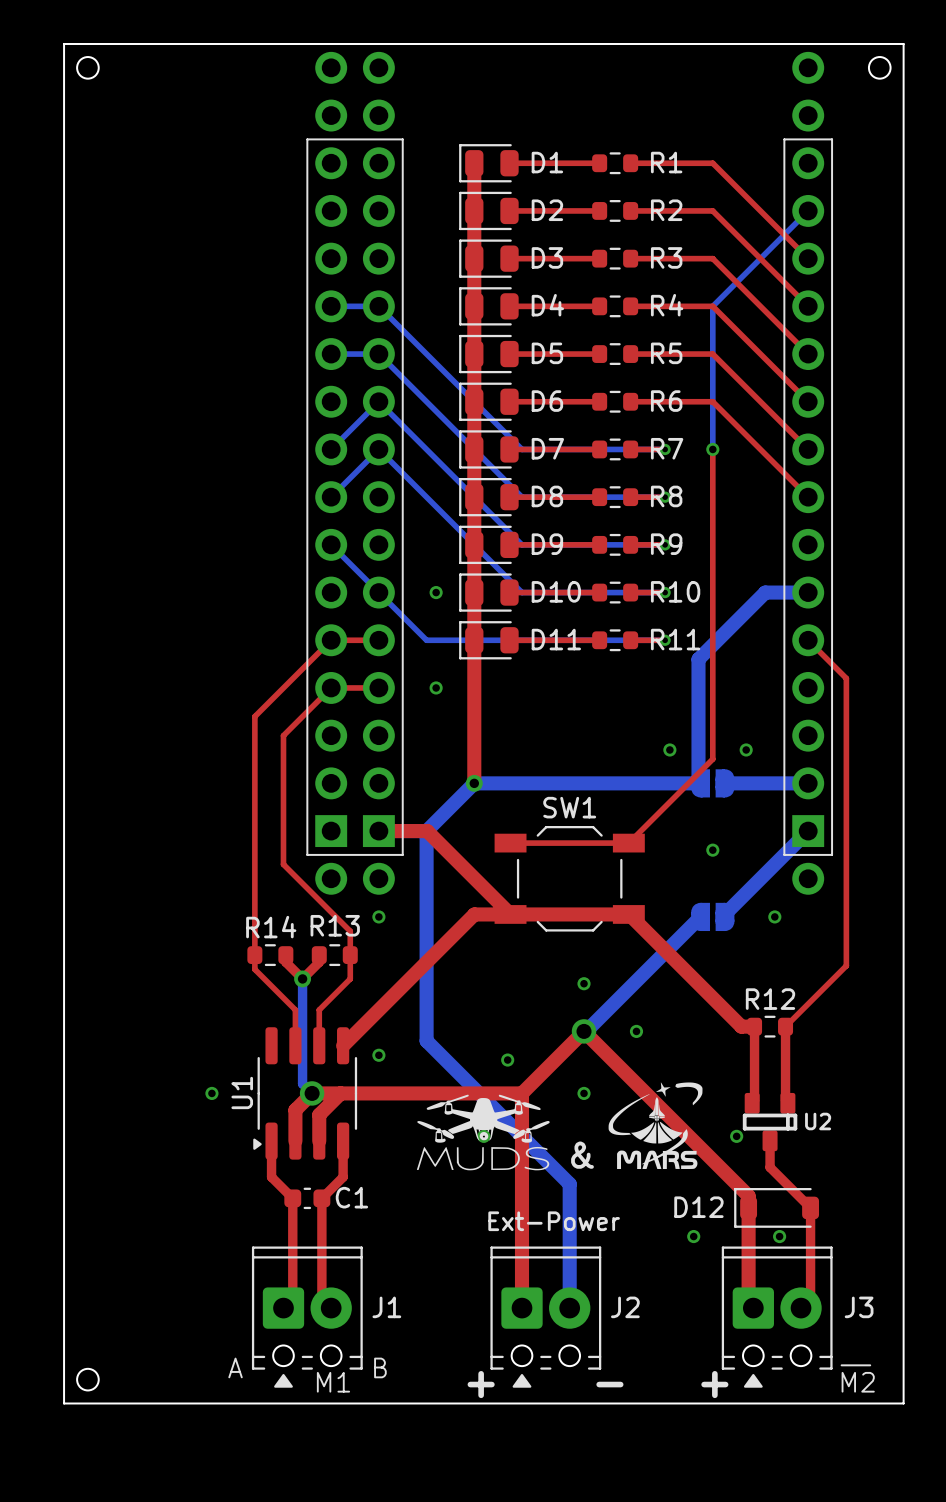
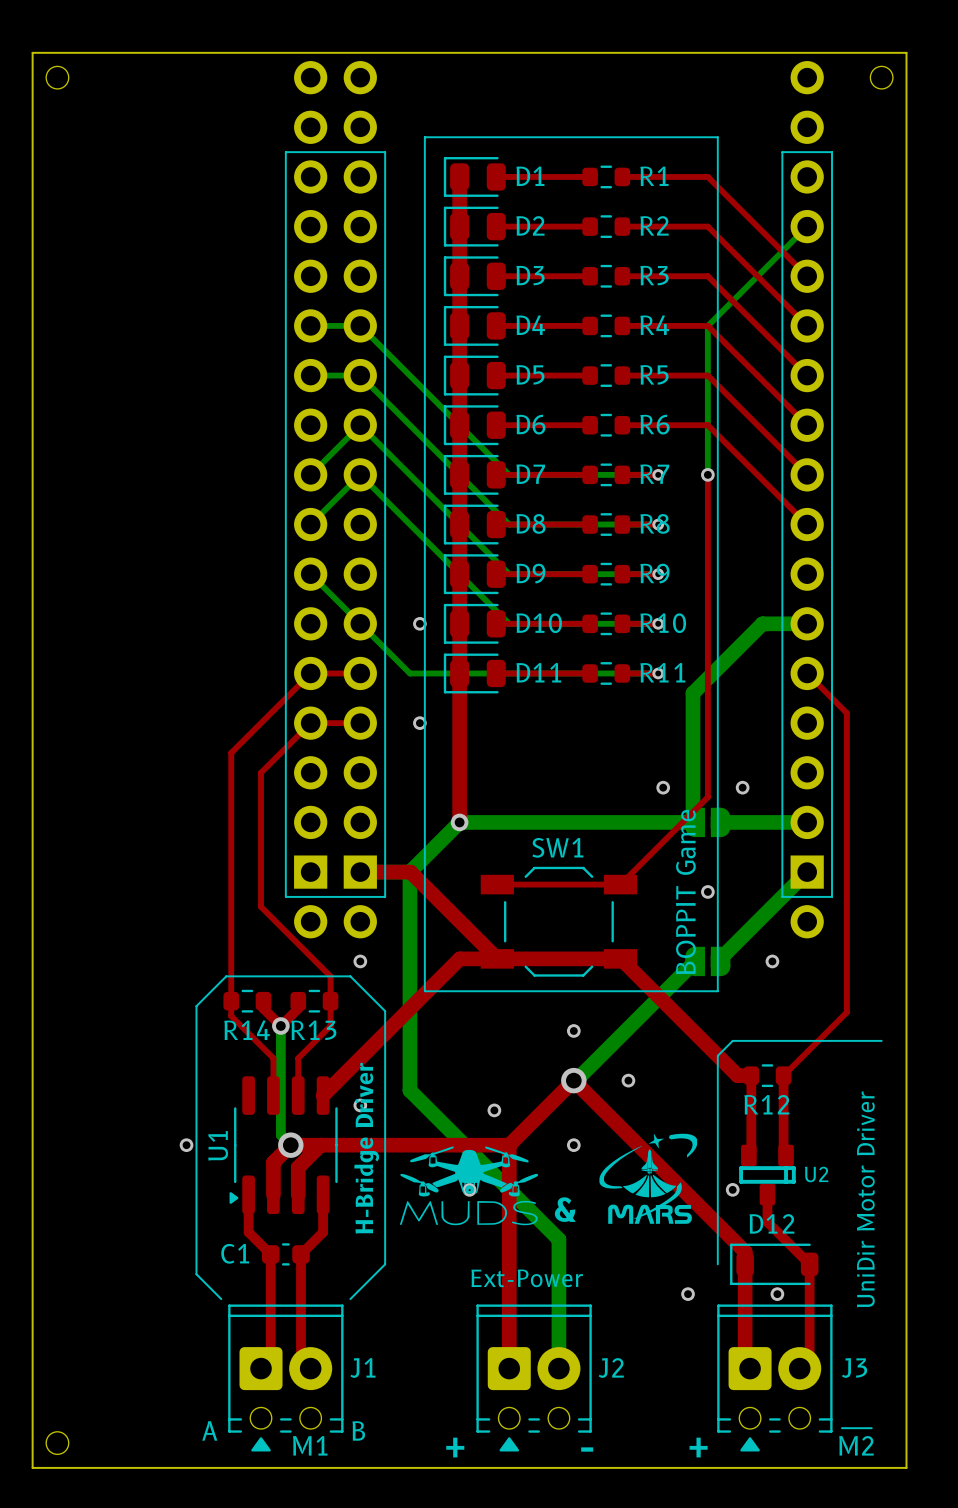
line: none -> (424, 137) (717, 137) (717, 991) (424, 991) (424, 137)
text: none -> BOPPIT Game (685, 892)
R13 name position: R13 (335, 925) -> R13 (313, 1030)
R14 name position: R14 (271, 927) -> R14 (247, 1030)
line: none -> (881, 1040) (732, 1040) (717, 1055) (717, 1264)
R12 name position: R12 (770, 999) -> R12 (766, 1104)
text: none -> H-Bridge Driver (366, 1148)
text: none -> UniDir Motor Driver (865, 1199)
C1 name position: C1 (351, 1197) -> C1 (235, 1253)
D12 name position: D12 (698, 1207) -> D12 (771, 1223)
line: none -> (221, 1299) (196, 1274) (196, 1006) (226, 976) (350, 976) (385, 1011) (385, 1264) (350, 1299)

